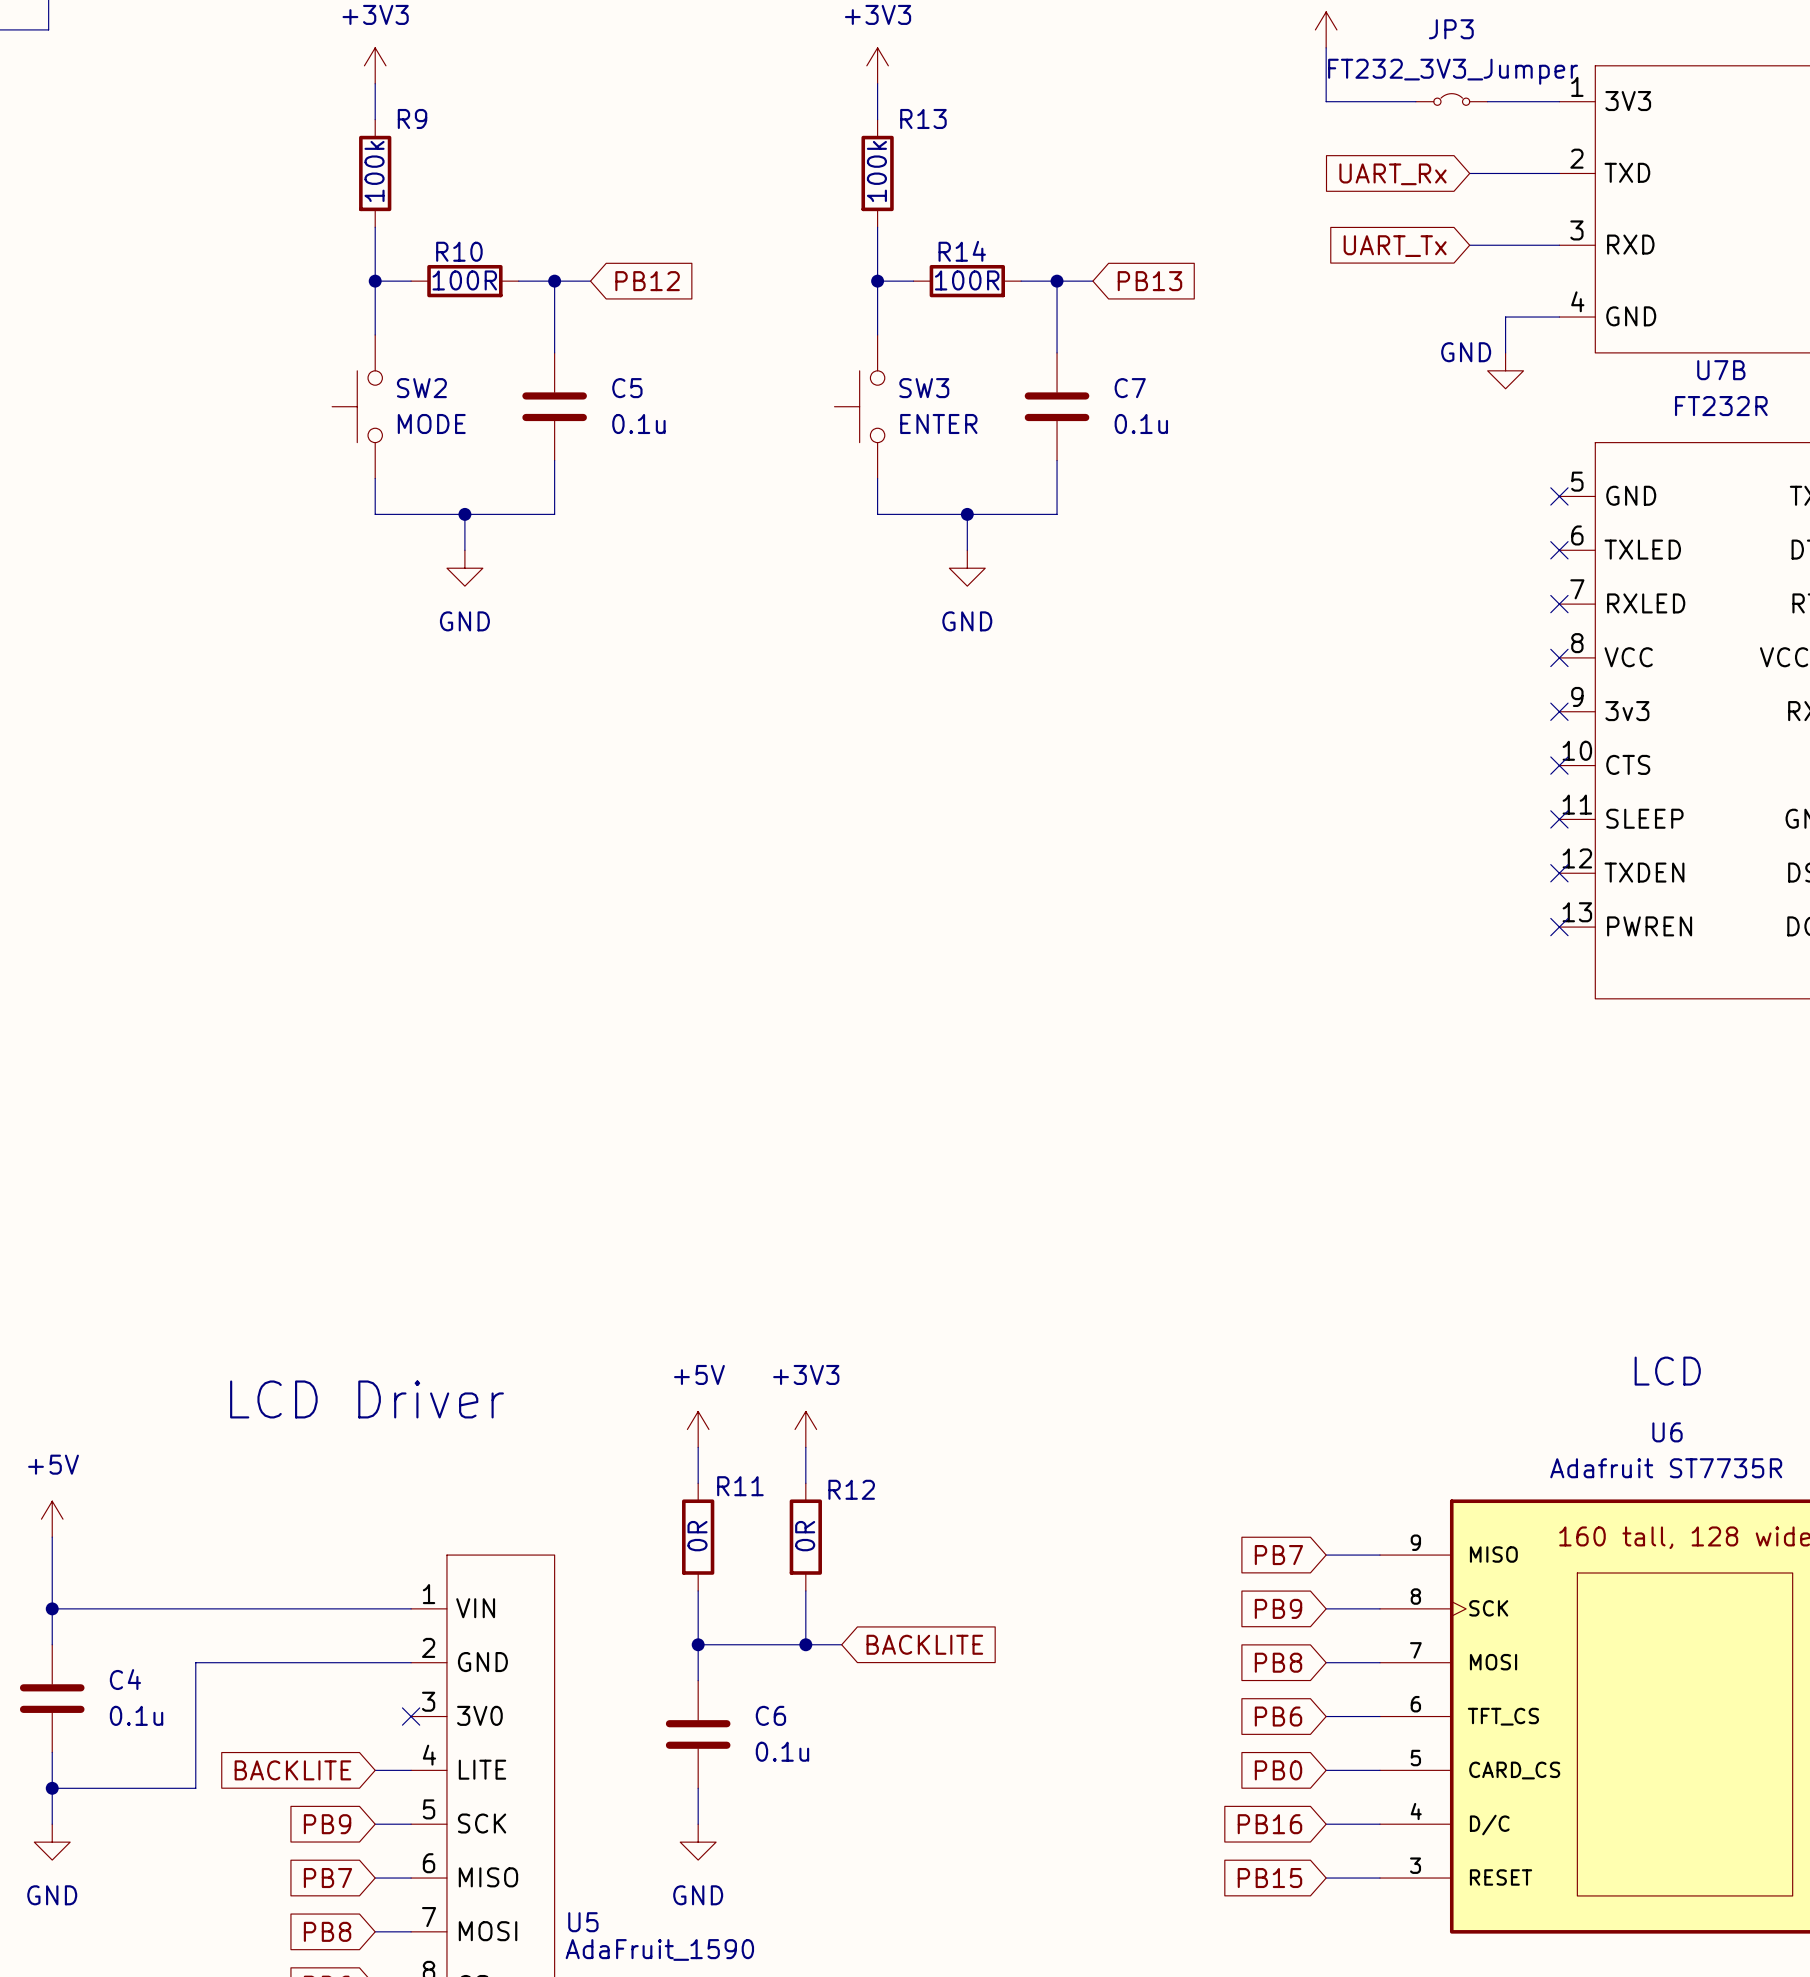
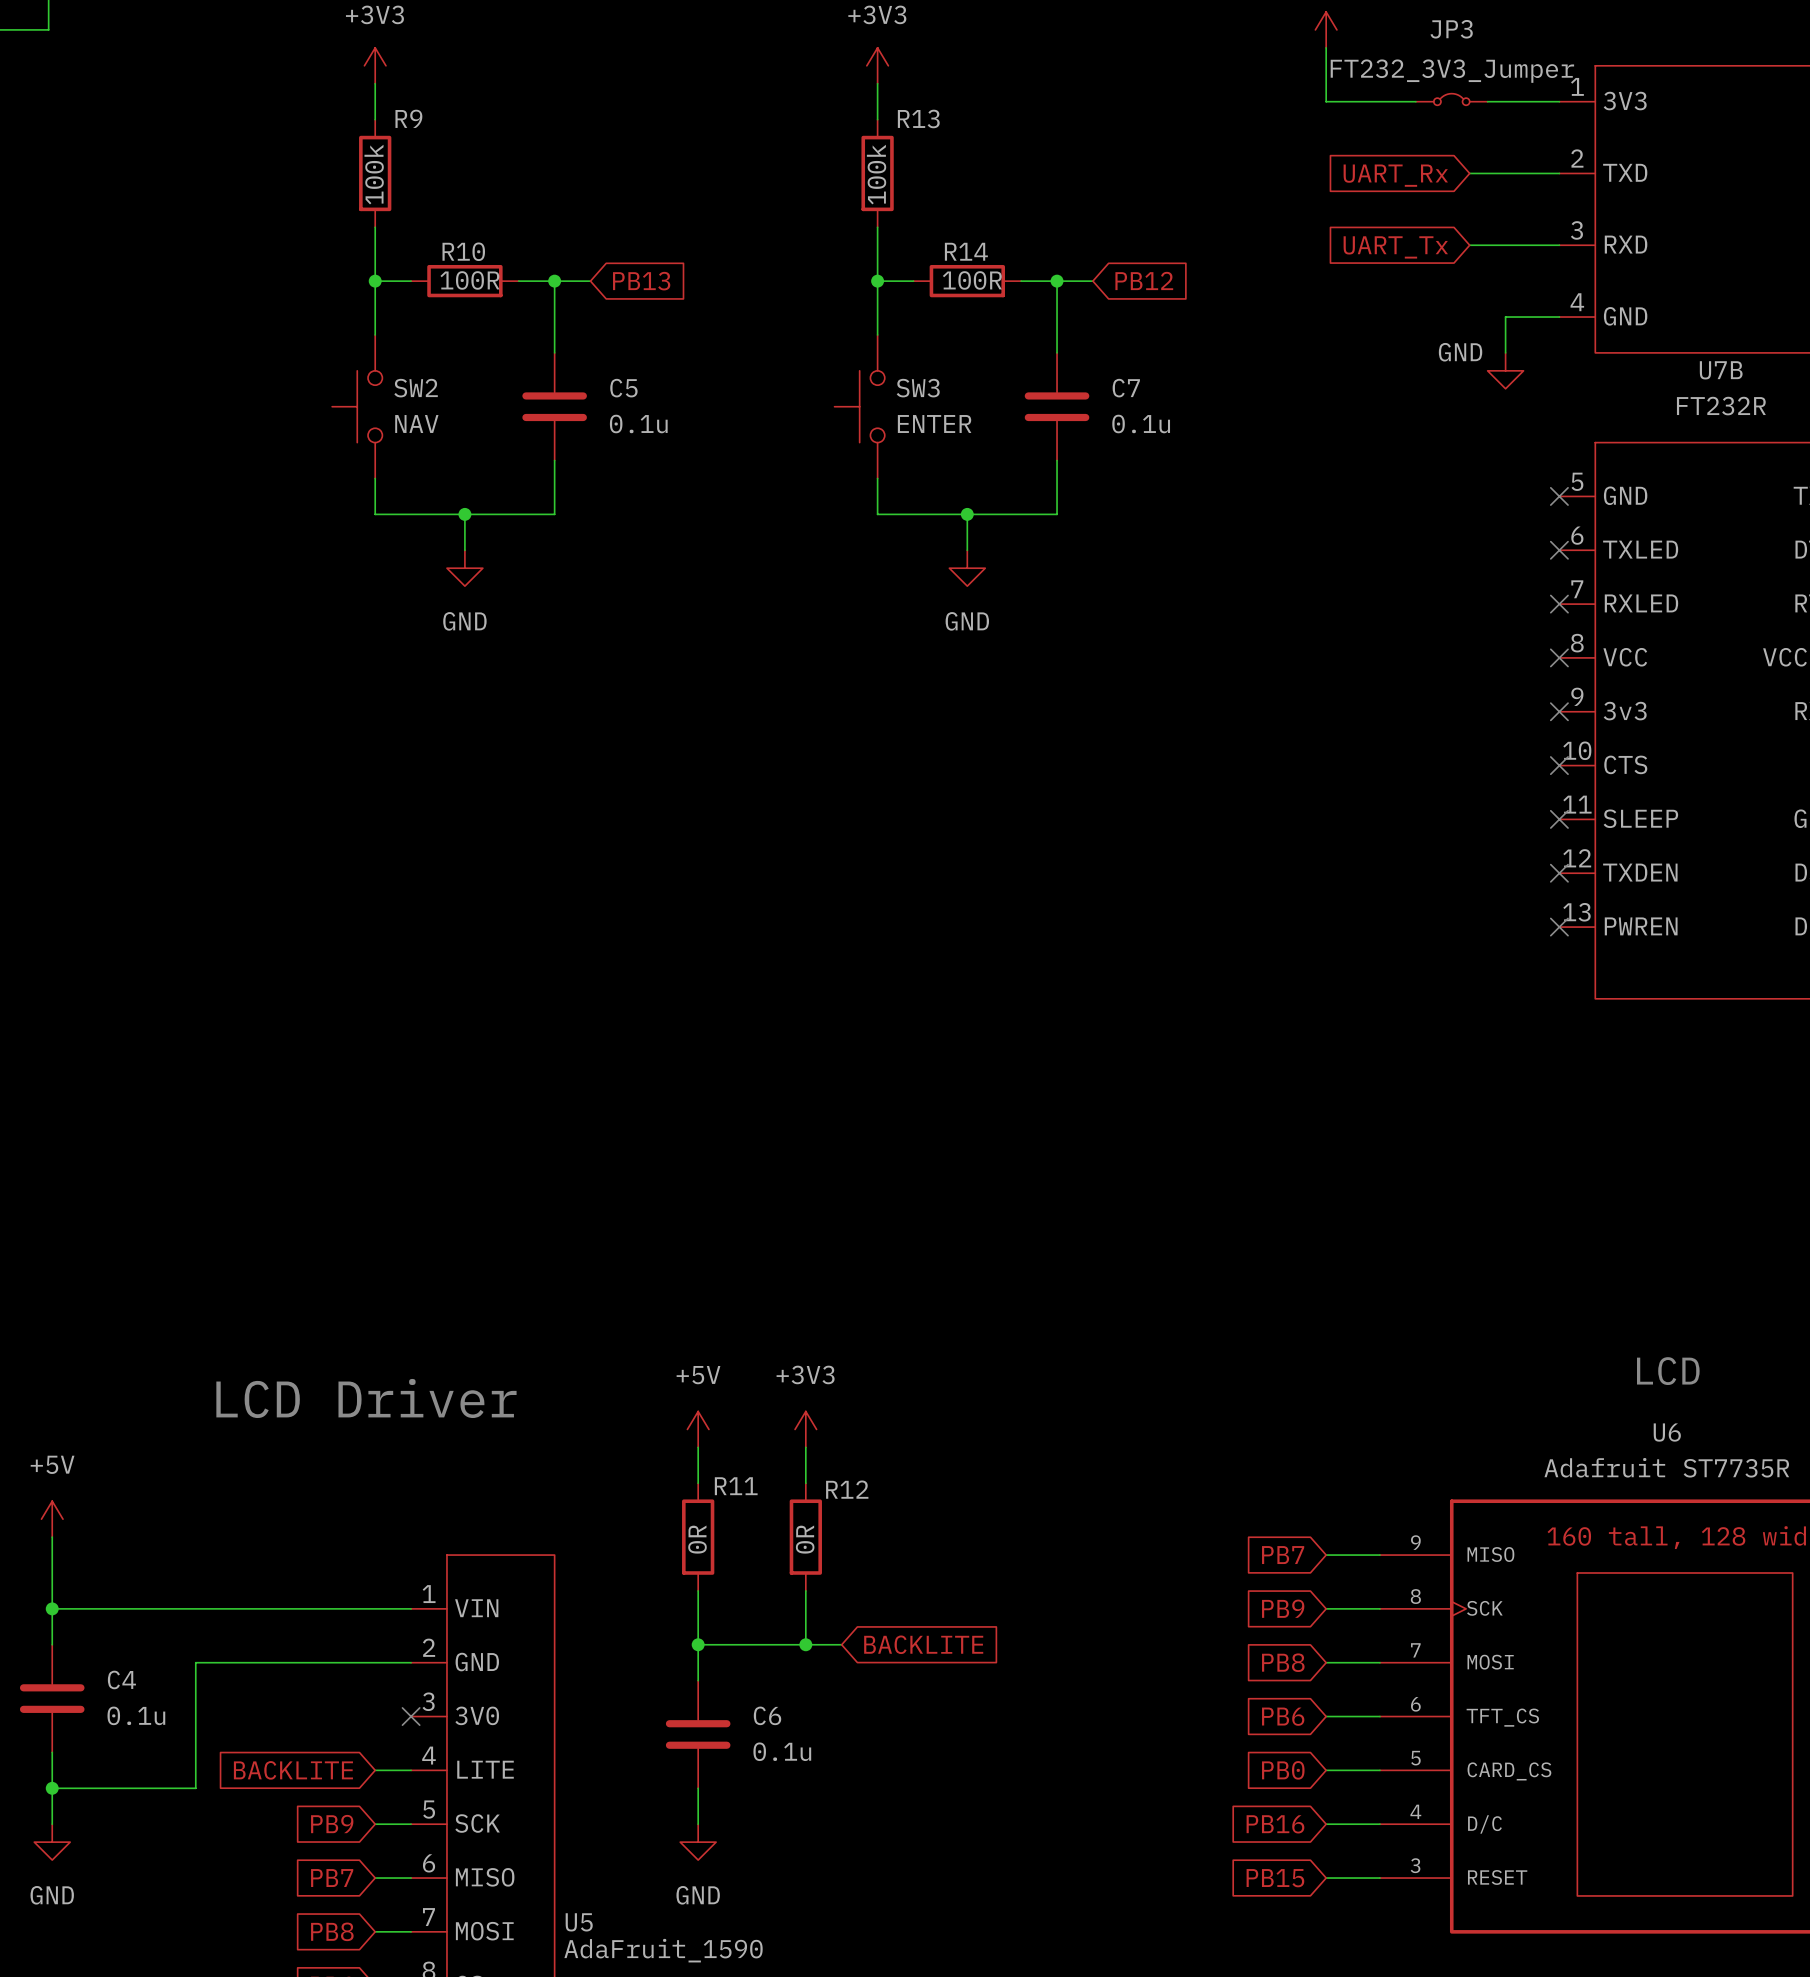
global label: PB12 (647, 281) -> PB13 (641, 281)
global label: PB13 (1149, 281) -> PB12 (1144, 280)
SW2 value: MODE (431, 424) -> NAV (416, 424)

